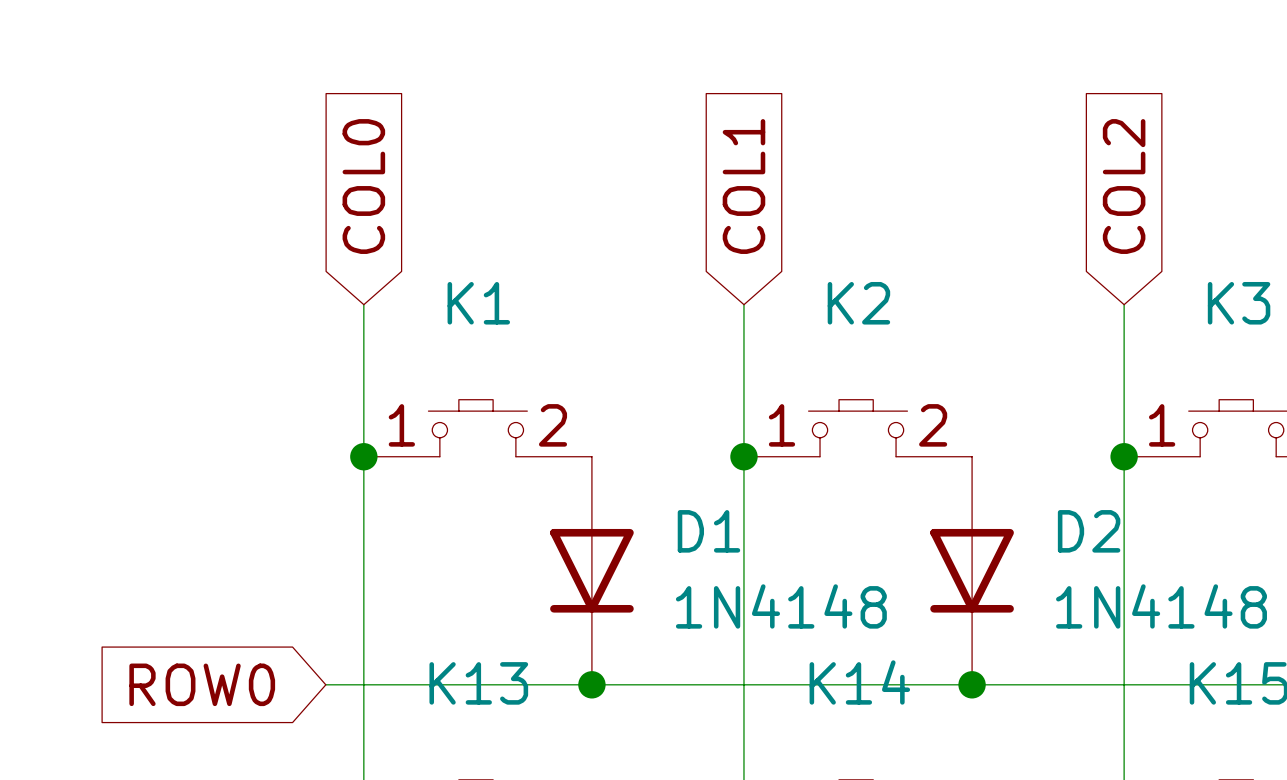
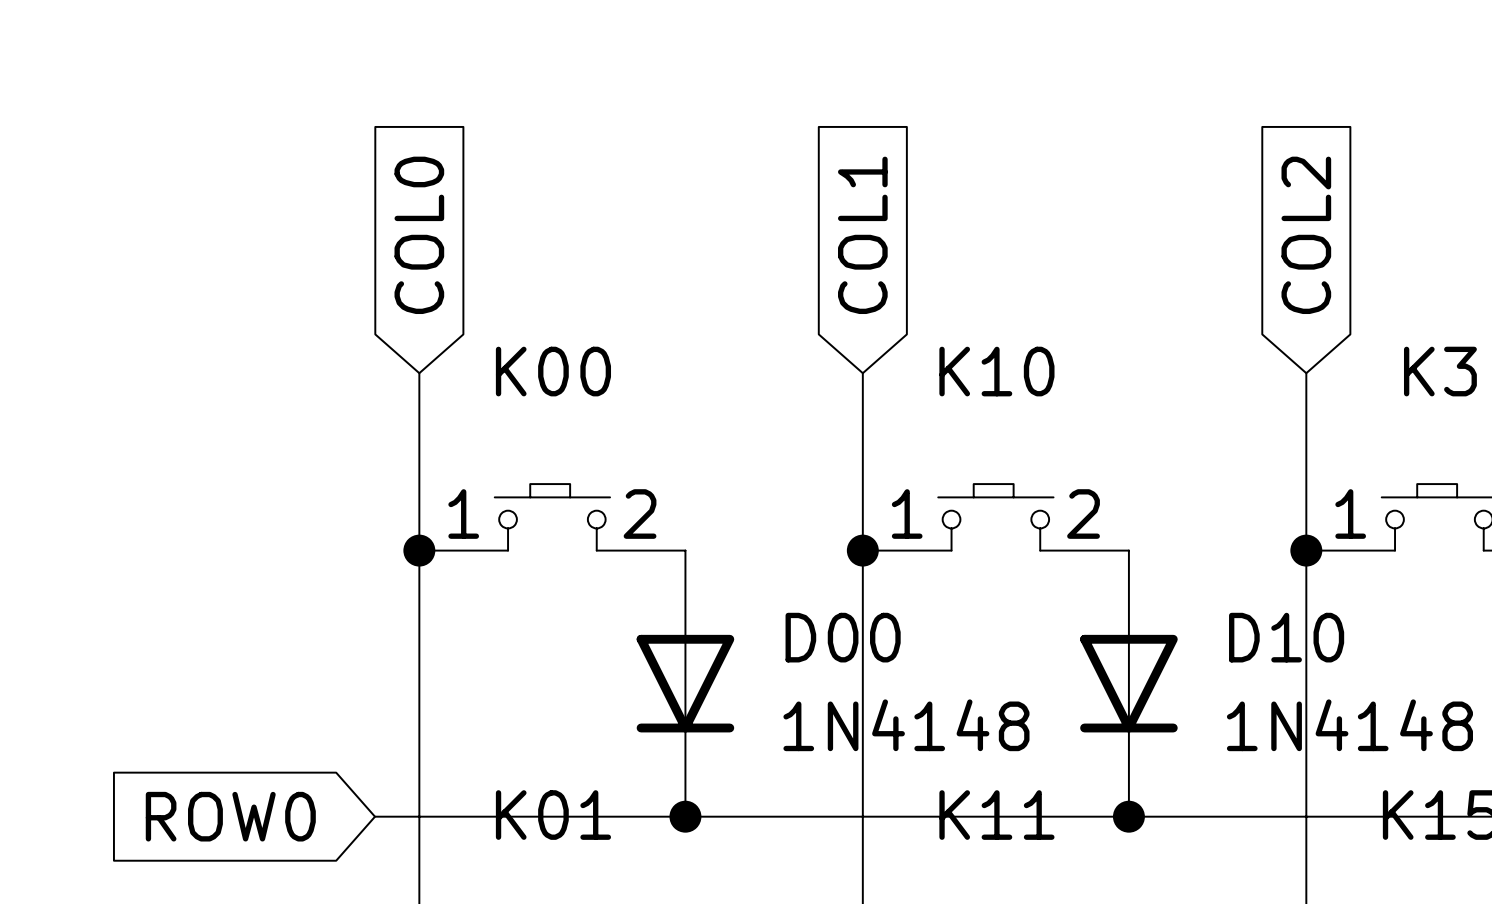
K1 name: K1 (478, 303) -> K00 (553, 371)
K2 name: K2 (858, 303) -> K10 (996, 371)
D1 name: D1 (708, 531) -> D00 (843, 637)
D2 name: D2 (1089, 531) -> D10 (1286, 637)
K14 name: K14 (859, 682) -> K11 (996, 815)
K13 name: K13 (478, 683) -> K01 (553, 815)

